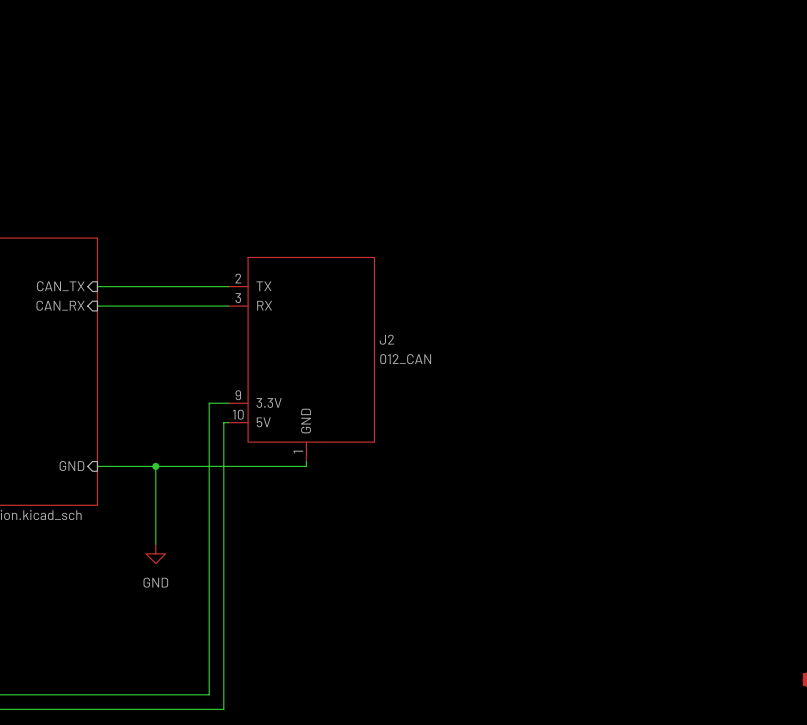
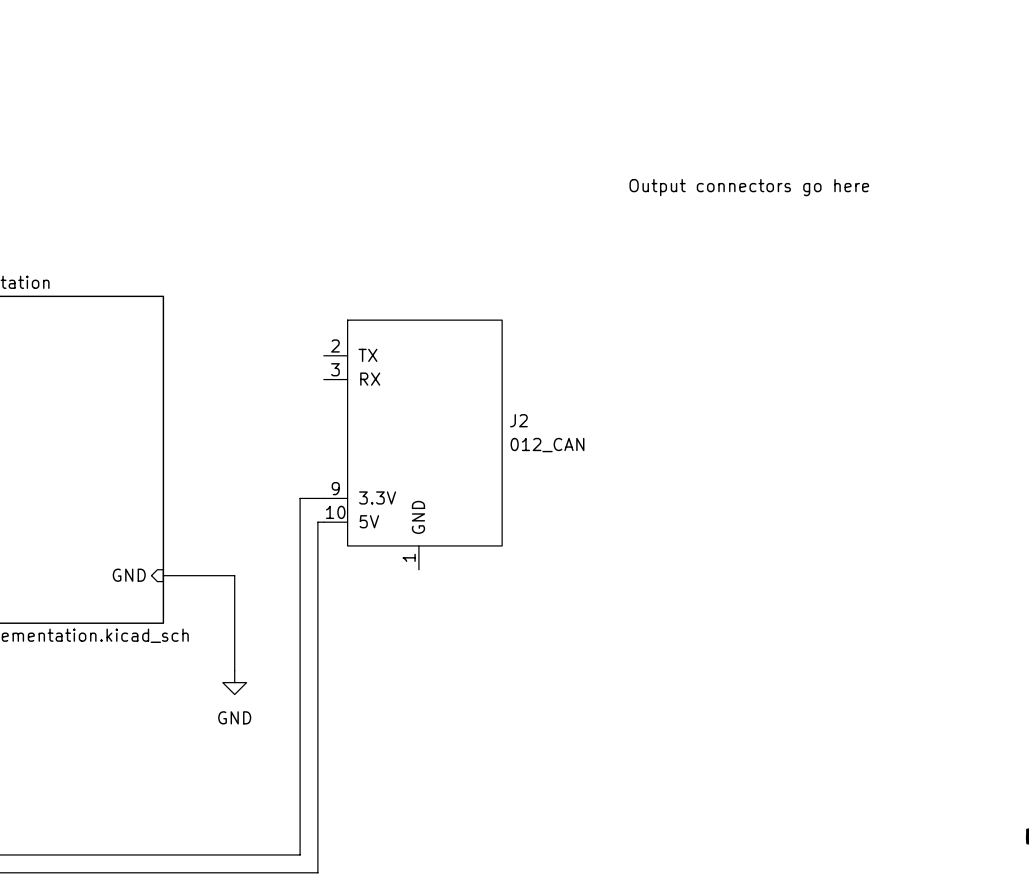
text: none -> Output connectors go here (749, 187)
sheet pin: CAN_TX (60, 286) -> none
wire: (97, 286) (228, 286) -> none
sheet pin: CAN_RX (60, 305) -> none
wire: (97, 306) (228, 306) -> none
wire: (306, 461) (306, 466) (155, 466) -> none
junction: (155, 466) -> none

